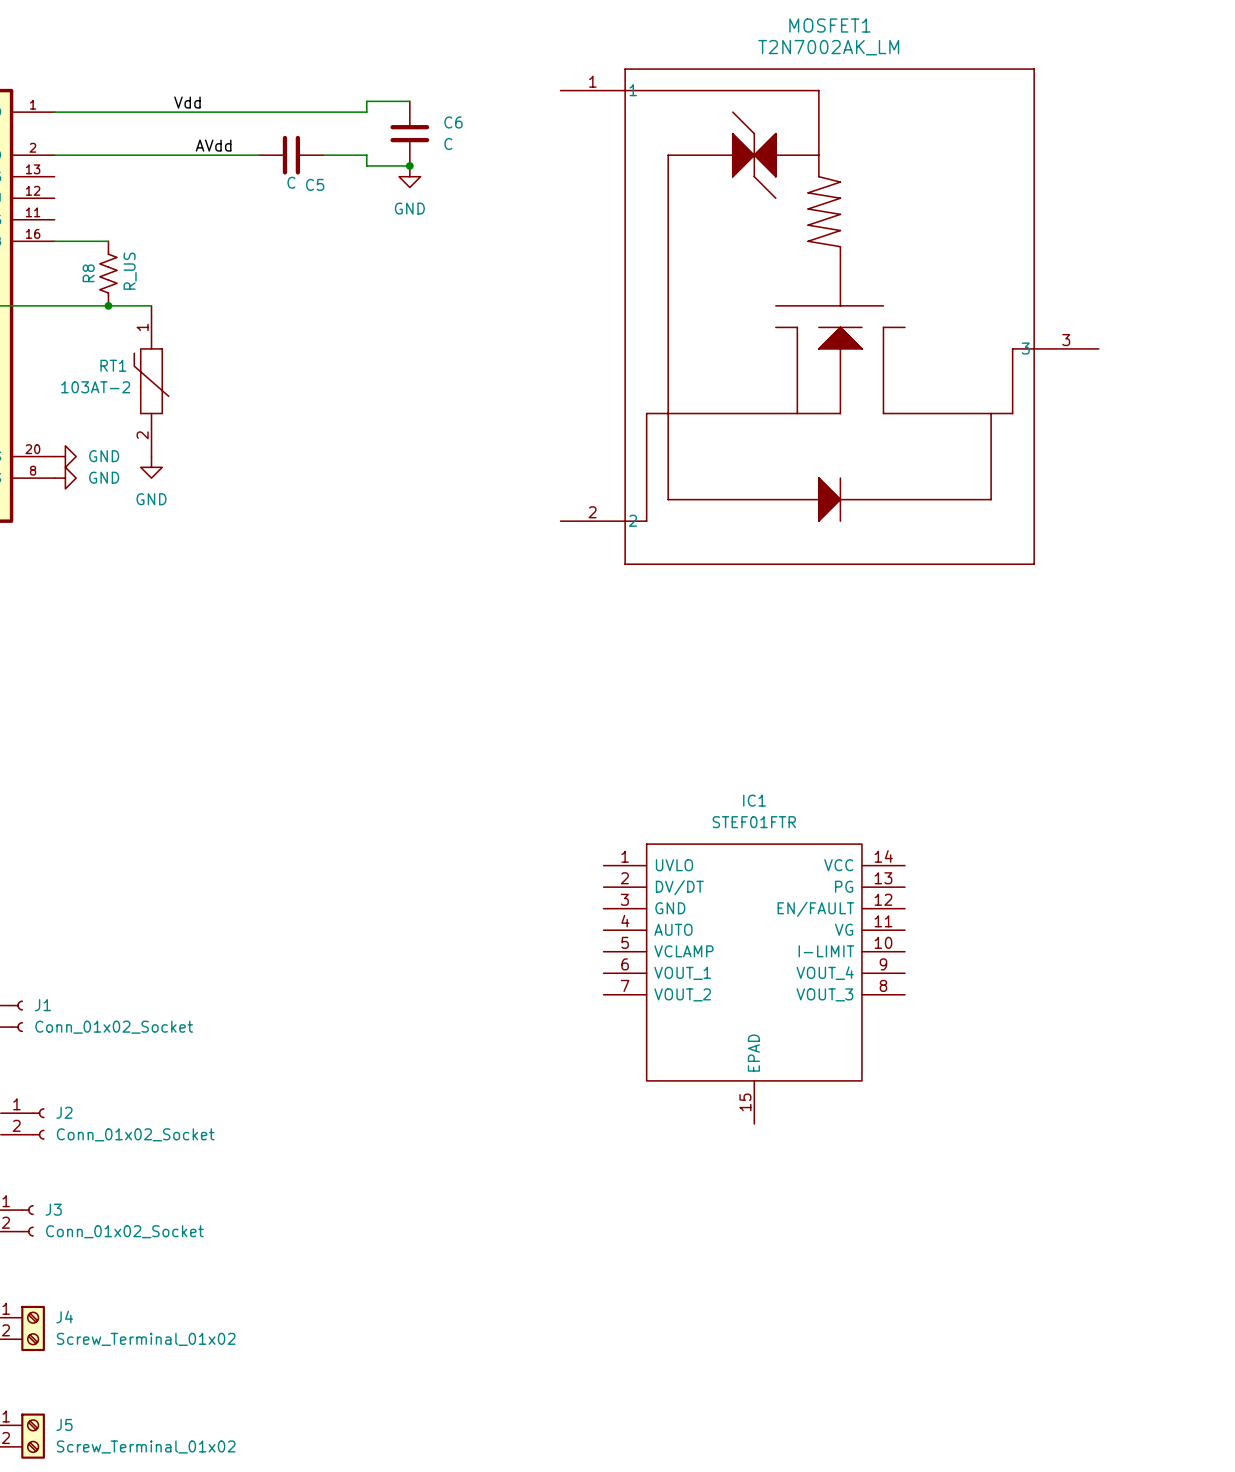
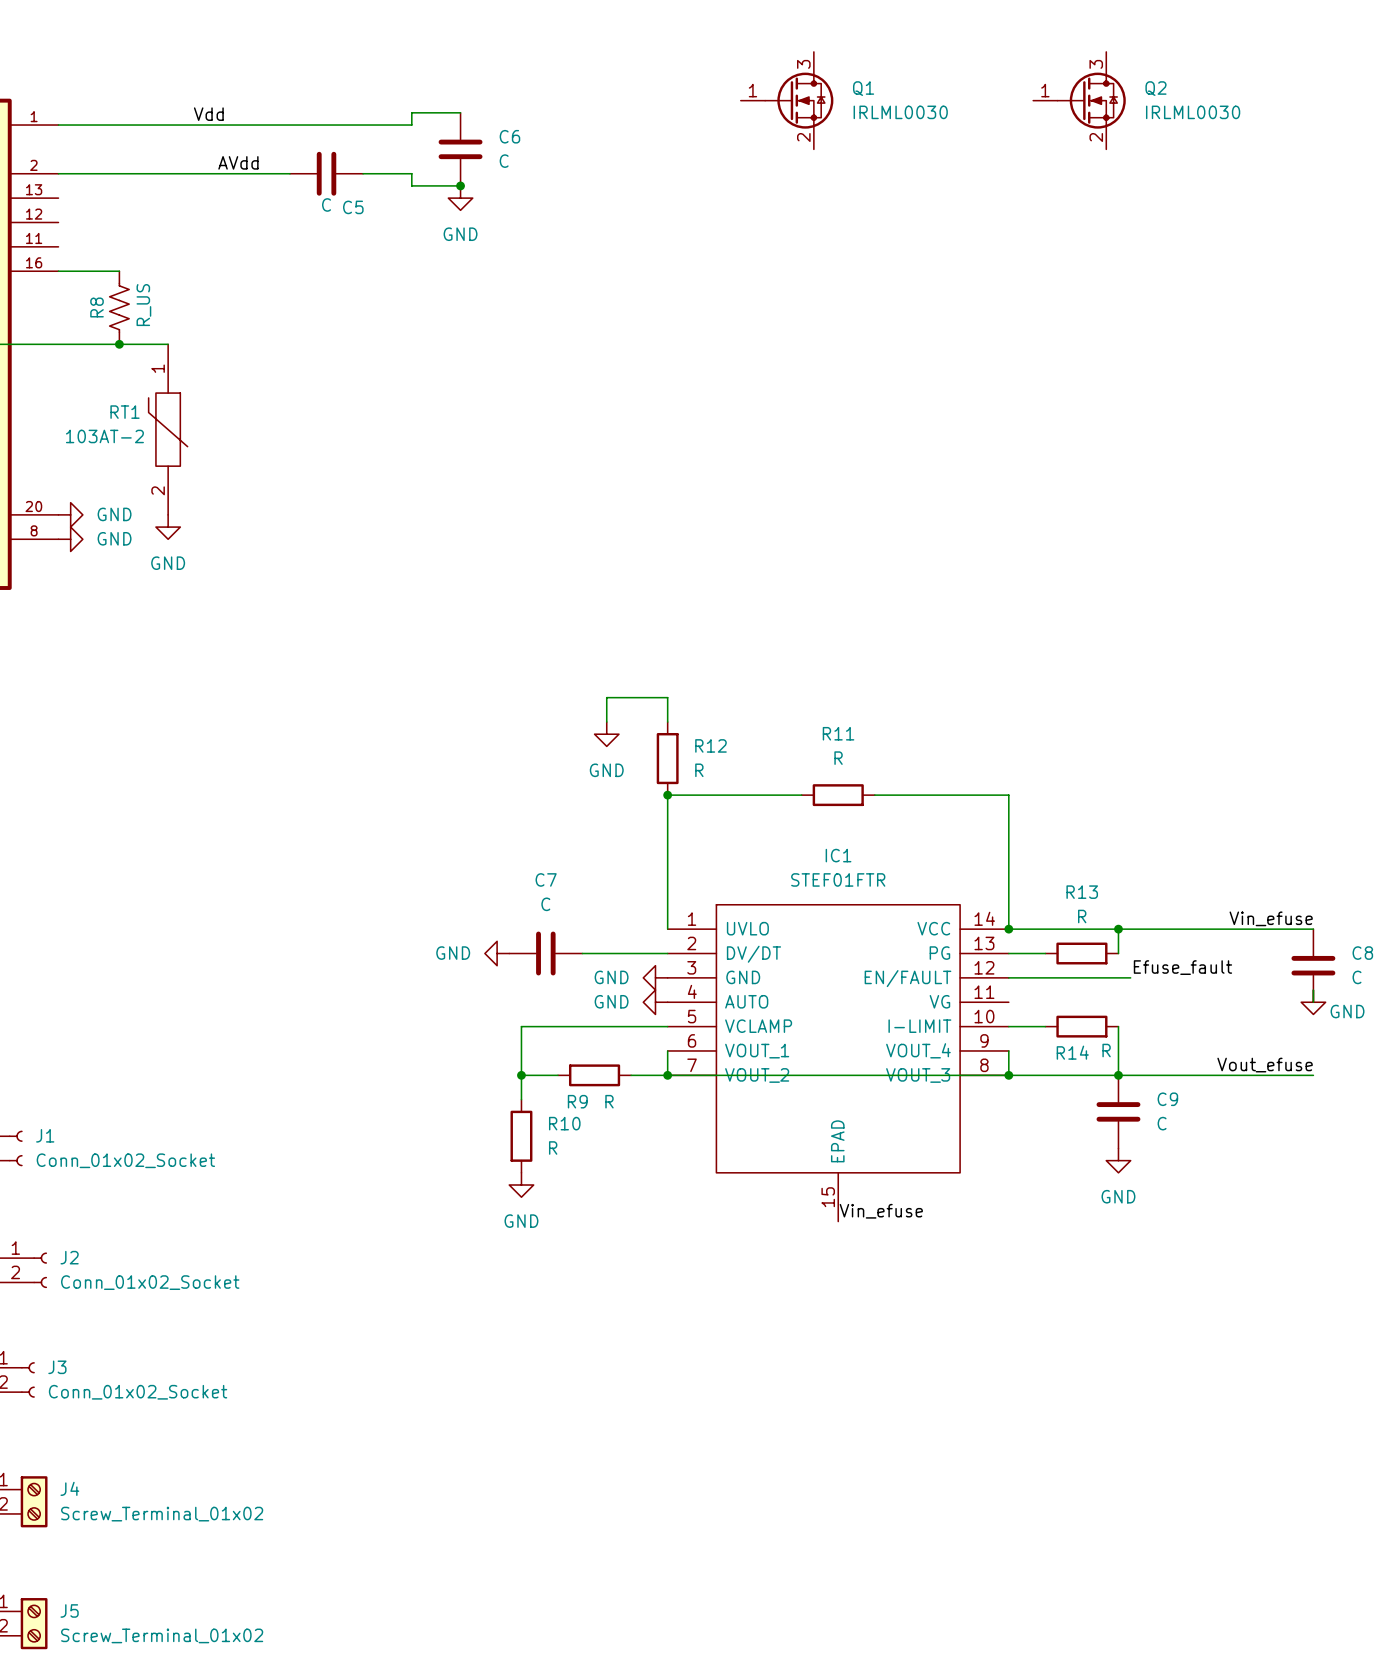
Q1: none -> IRLML0030 (787, 100)
Q2: none -> IRLML0030 (1079, 100)
MOSFET1: T2N7002AK_LM (829, 316) -> none
wire: none -> (606, 722) (606, 697) (667, 697) (667, 722)
power symbol: none -> GND (606, 734)
R12: none -> R (667, 758)
junction: none -> (667, 795)
wire: none -> (801, 795) (667, 795) (667, 929)
R11: none -> R (838, 795)
wire: none -> (874, 795) (1008, 795) (1008, 929) (1313, 929)
label: none -> Vin_efuse (1271, 918)
junction: none -> (1008, 929)
wire: none -> (1118, 929) (1118, 953)
junction: none -> (1118, 929)
power symbol: none -> GND (497, 953)
C7: none -> C (545, 953)
wire: none -> (582, 953) (667, 953)
wire: none -> (1008, 953) (1045, 953)
R13: none -> R (1081, 953)
C8: none -> C (1313, 965)
label: none -> Efuse_fault (1182, 967)
power symbol: none -> GND (655, 977)
wire: none -> (1008, 977) (1130, 977)
wire: none -> (1313, 990) (1313, 1002)
power symbol: none -> GND (655, 1002)
power symbol: none -> GND (1313, 1002)
wire: none -> (667, 1026) (521, 1026) (521, 1099)
wire: none -> (1008, 1026) (1045, 1026)
R14: none -> R (1081, 1026)
wire: none -> (1118, 1026) (1118, 1075)
wire: none -> (667, 1050) (667, 1075)
wire: none -> (1008, 1050) (1008, 1075)
label: none -> Vout_efuse (1265, 1065)
wire: none -> (521, 1075) (558, 1075)
junction: none -> (521, 1075)
R9: none -> R (594, 1075)
wire: none -> (631, 1075) (1313, 1075)
junction: none -> (667, 1075)
junction: none -> (1008, 1075)
junction: none -> (1118, 1075)
IC1 position: (754, 983) -> (838, 1062)
C9: none -> C (1118, 1111)
R10: none -> R (521, 1136)
power symbol: none -> GND (1118, 1160)
power symbol: none -> GND (521, 1185)
label: none -> Vin_efuse (881, 1211)

